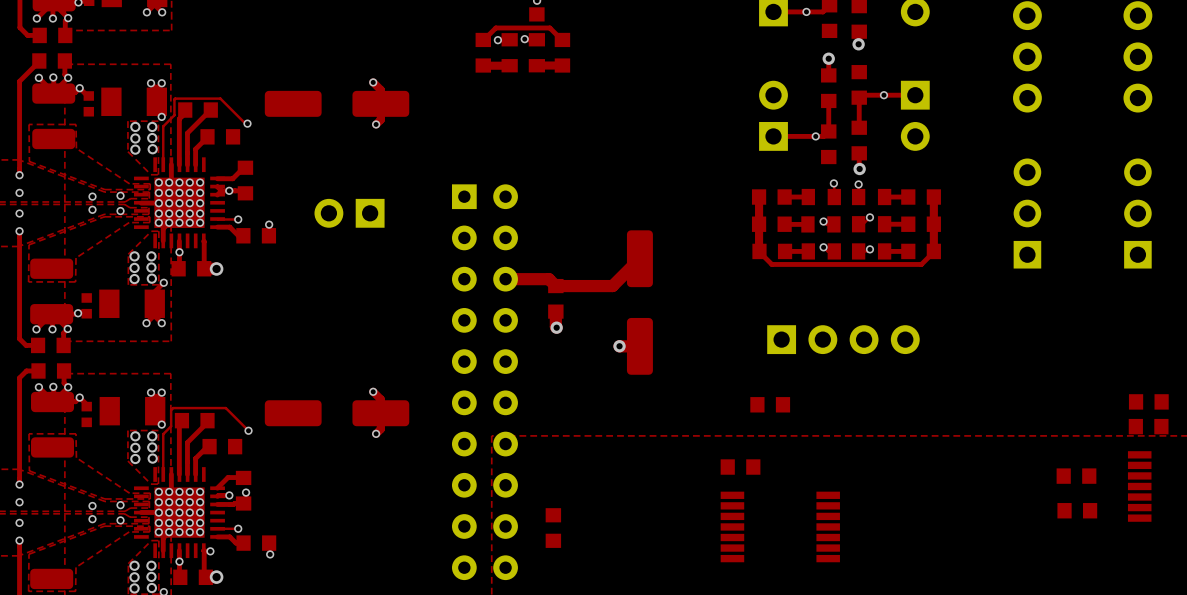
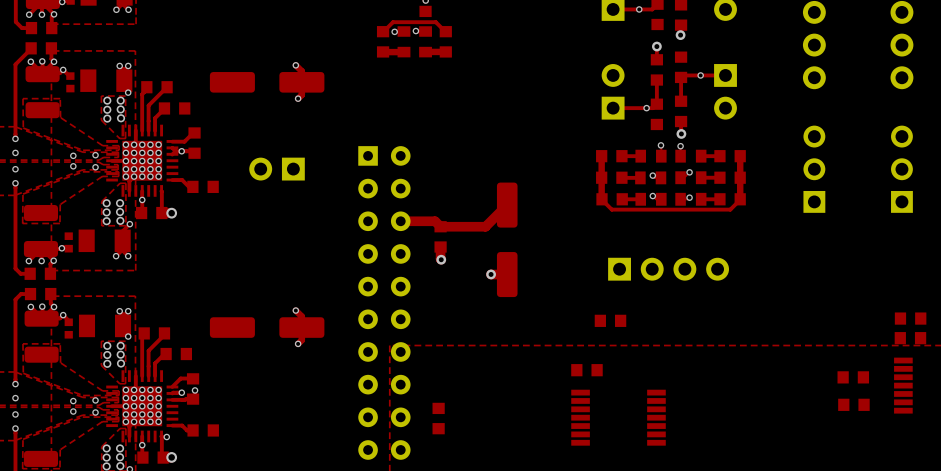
top track: (247, 123) (220, 98) (175, 98) (174, 115) (163, 126) (163, 164) -> none
via: (247, 123) -> none
top track: (217, 219) (238, 219) -> none
via: (238, 219) -> none
via: (269, 224) -> none
top track: (248, 430) (225, 408) (173, 408) (171, 409) (171, 426) (163, 434) (163, 474) -> none
via: (248, 430) -> none
top track: (238, 528) (217, 528) -> none
via: (238, 528) -> none
via: (270, 554) -> none

